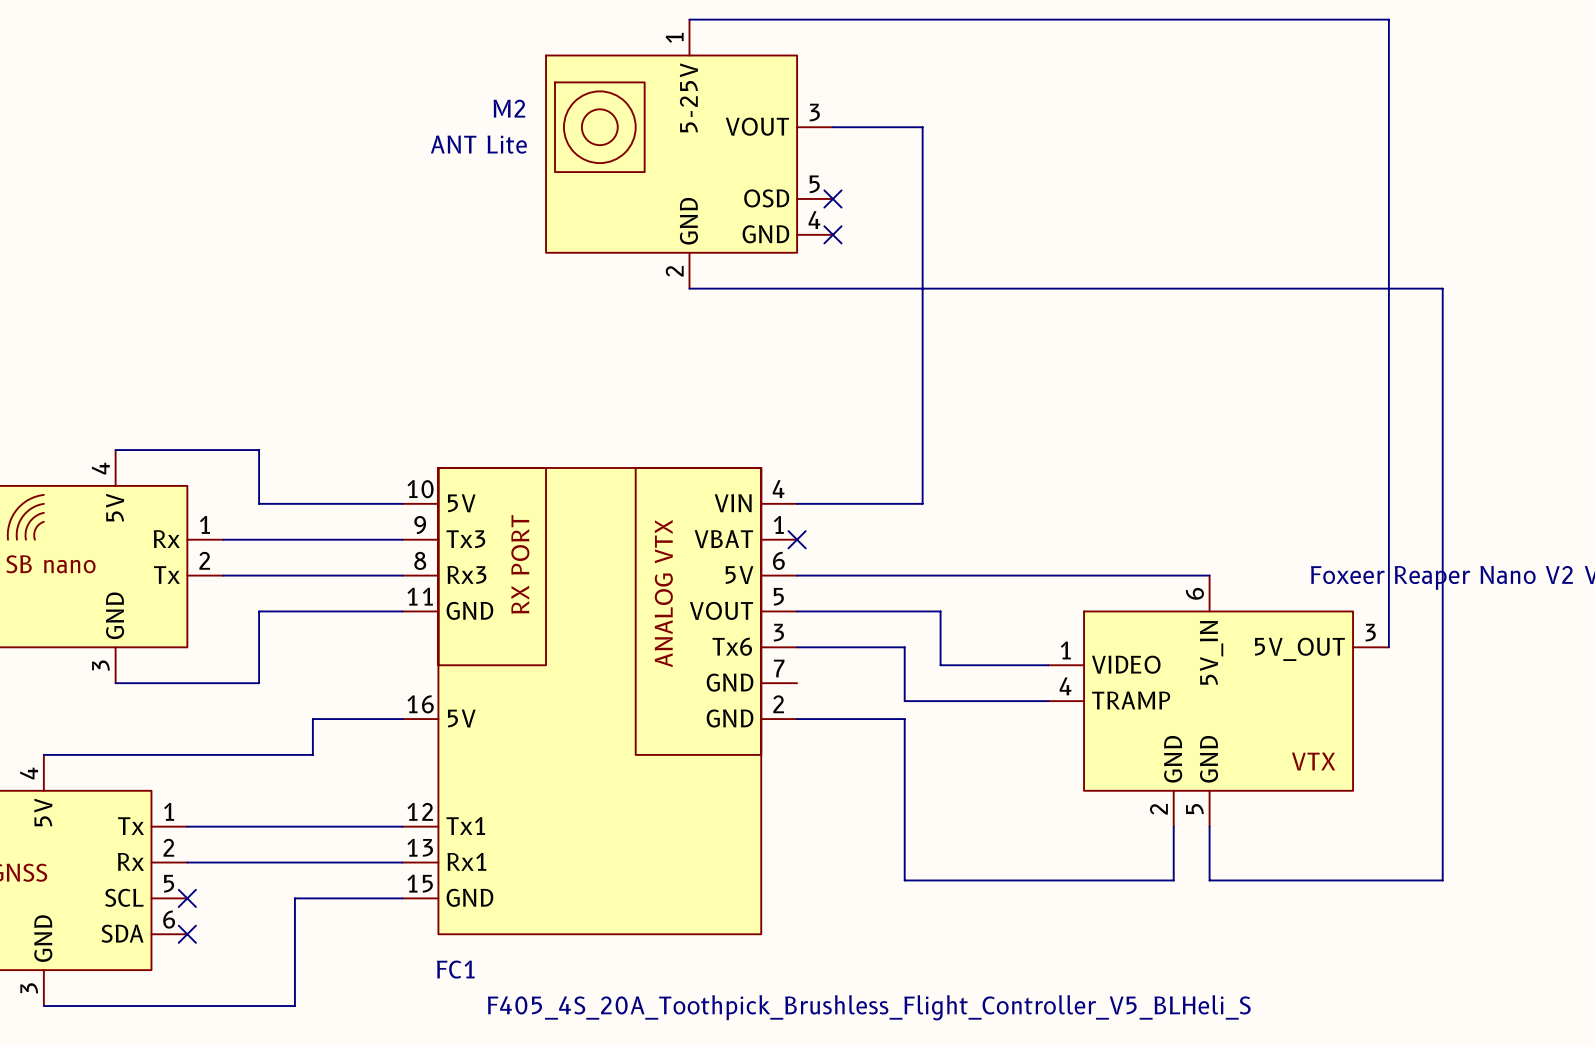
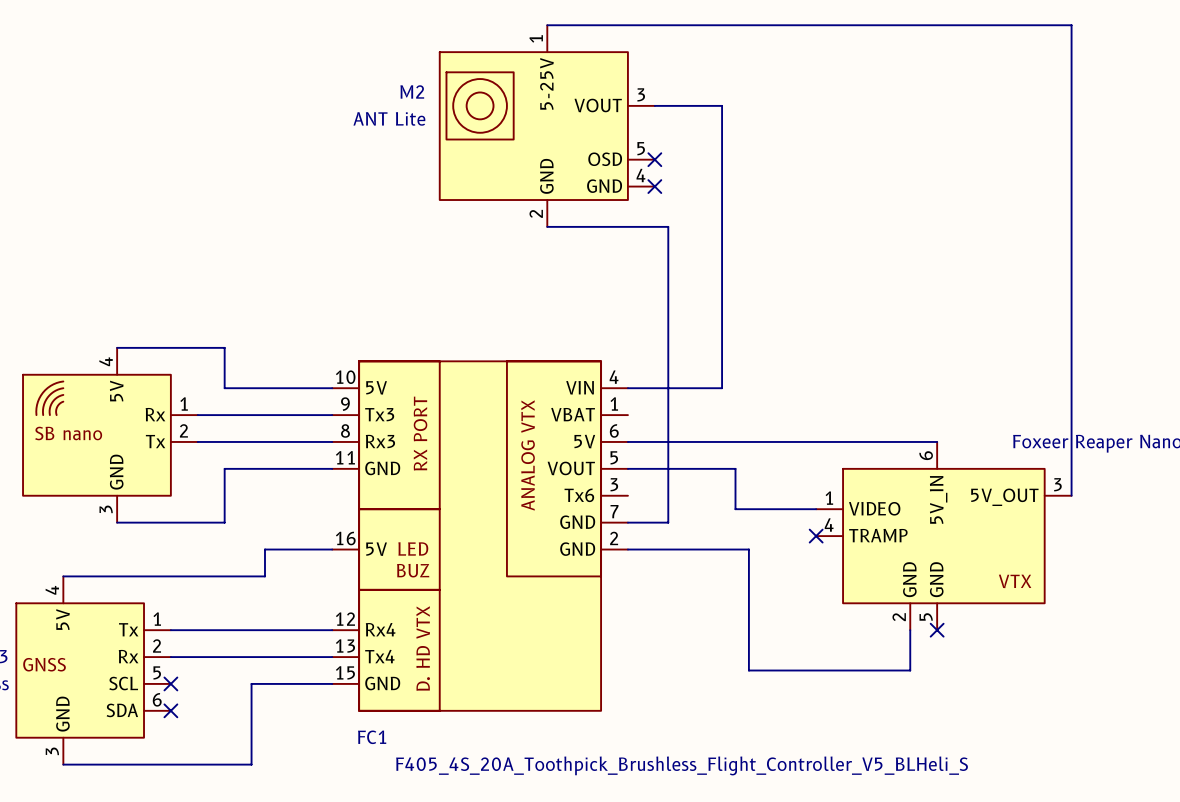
wire: (850, 288) (1442, 288) (1442, 880) (1209, 880) (1209, 826) -> (668, 226) (668, 522) (627, 522)
FC1 symbol: [402, 467, 798, 935] -> [332, 361, 628, 711]
no-connect mark: (797, 539) -> none
wire: (797, 647) (904, 647) (904, 701) (1048, 701) -> none
no-connect mark: none -> (816, 536)
wire: (904, 719) (904, 880) (958, 880) -> (708, 549) (748, 549) (748, 670)
no-connect mark: none -> (937, 630)

